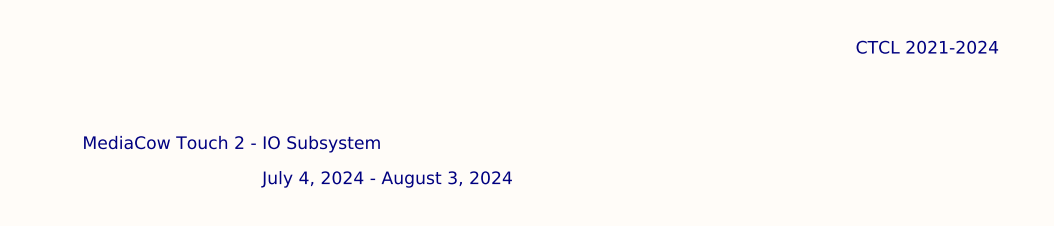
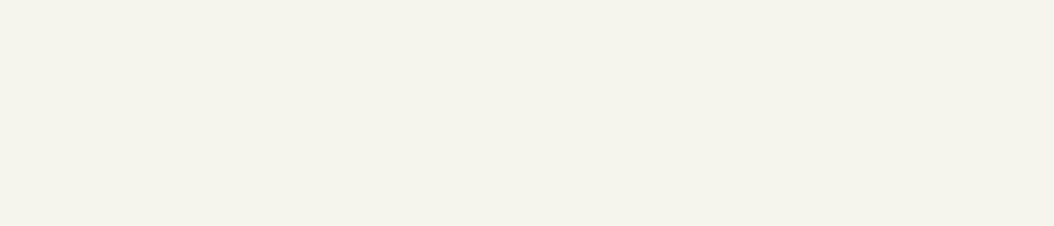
text: CTCL 2021-2024 (927, 47) -> none
text: MediaCow Touch 2 - IO Subsystem (231, 144) -> none
text: July 4, 2024 - August 3, 2024 (386, 179) -> none

